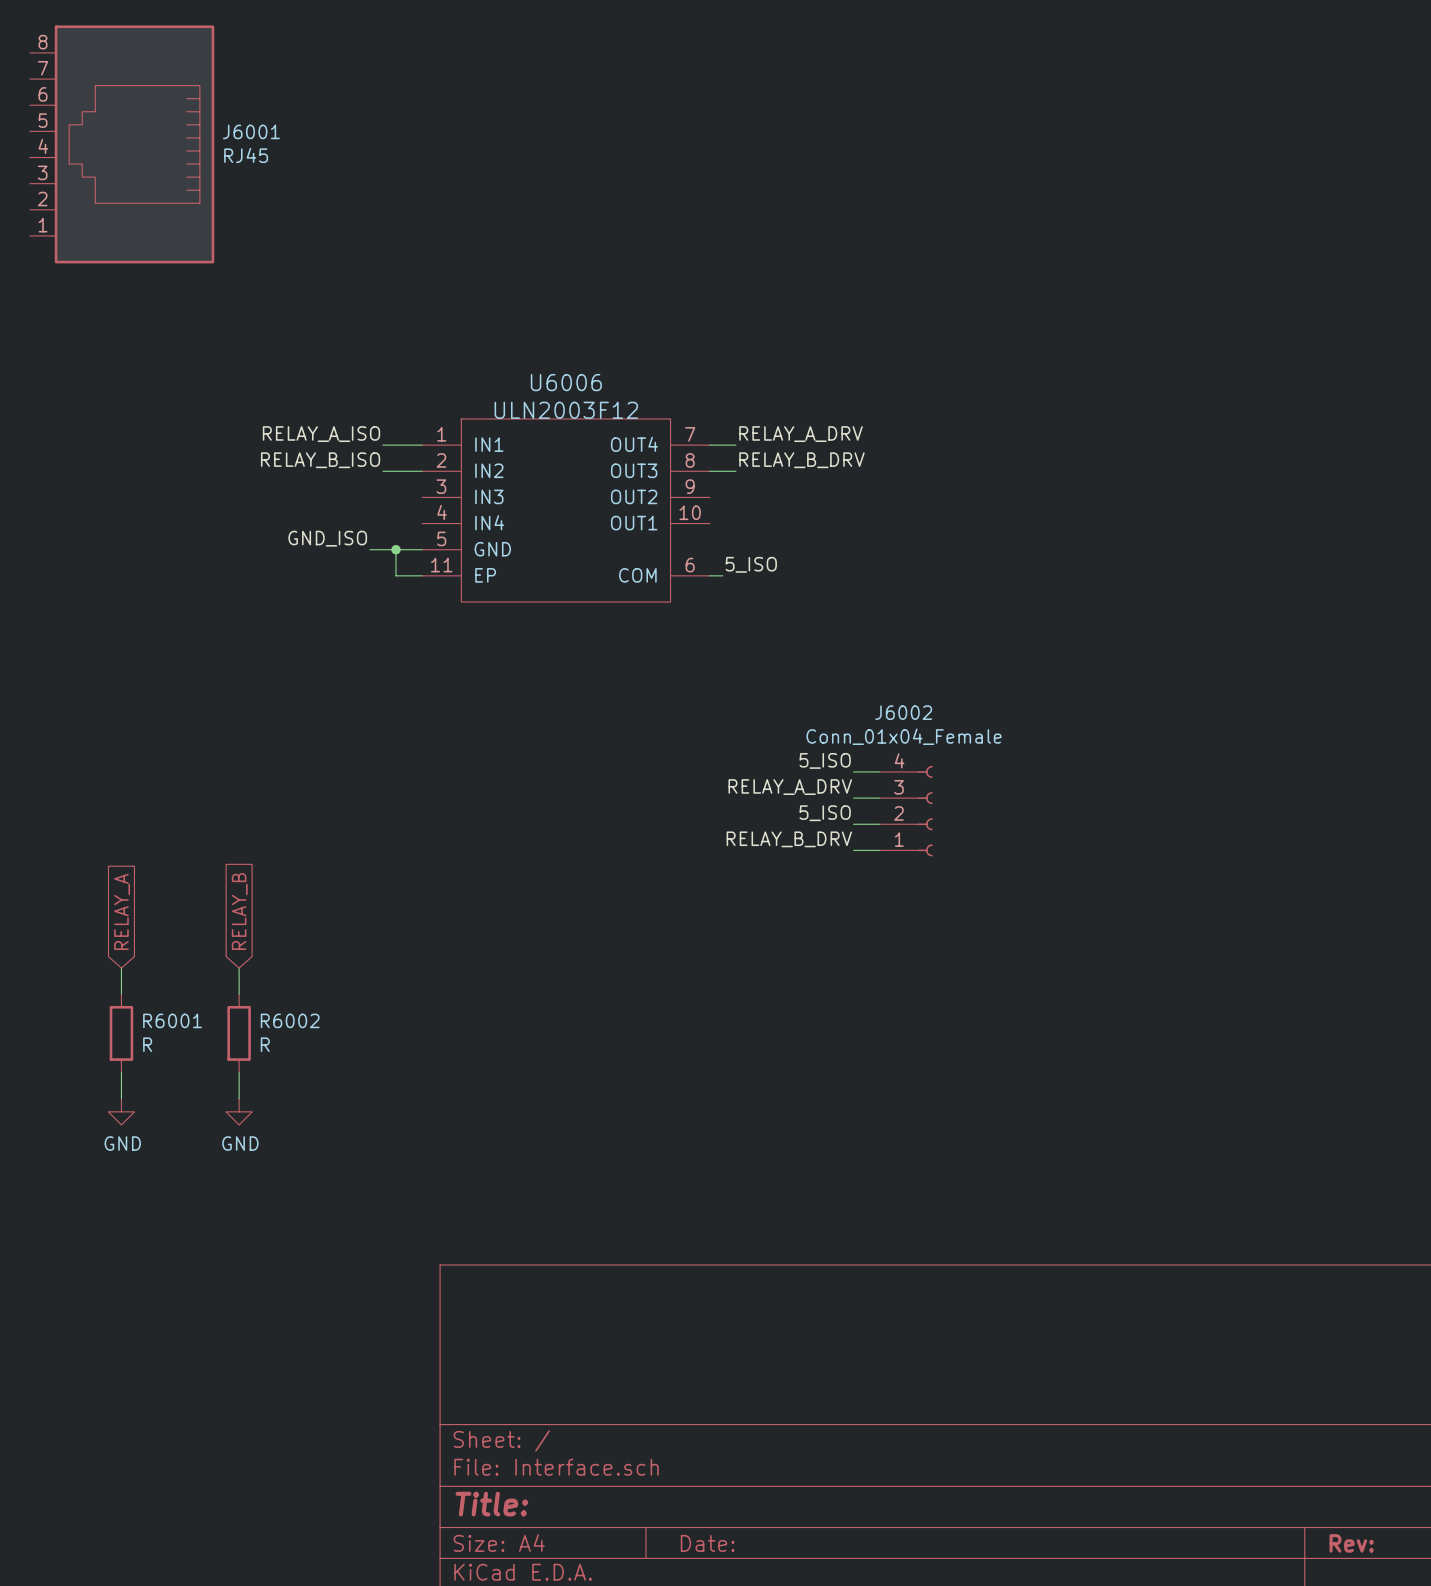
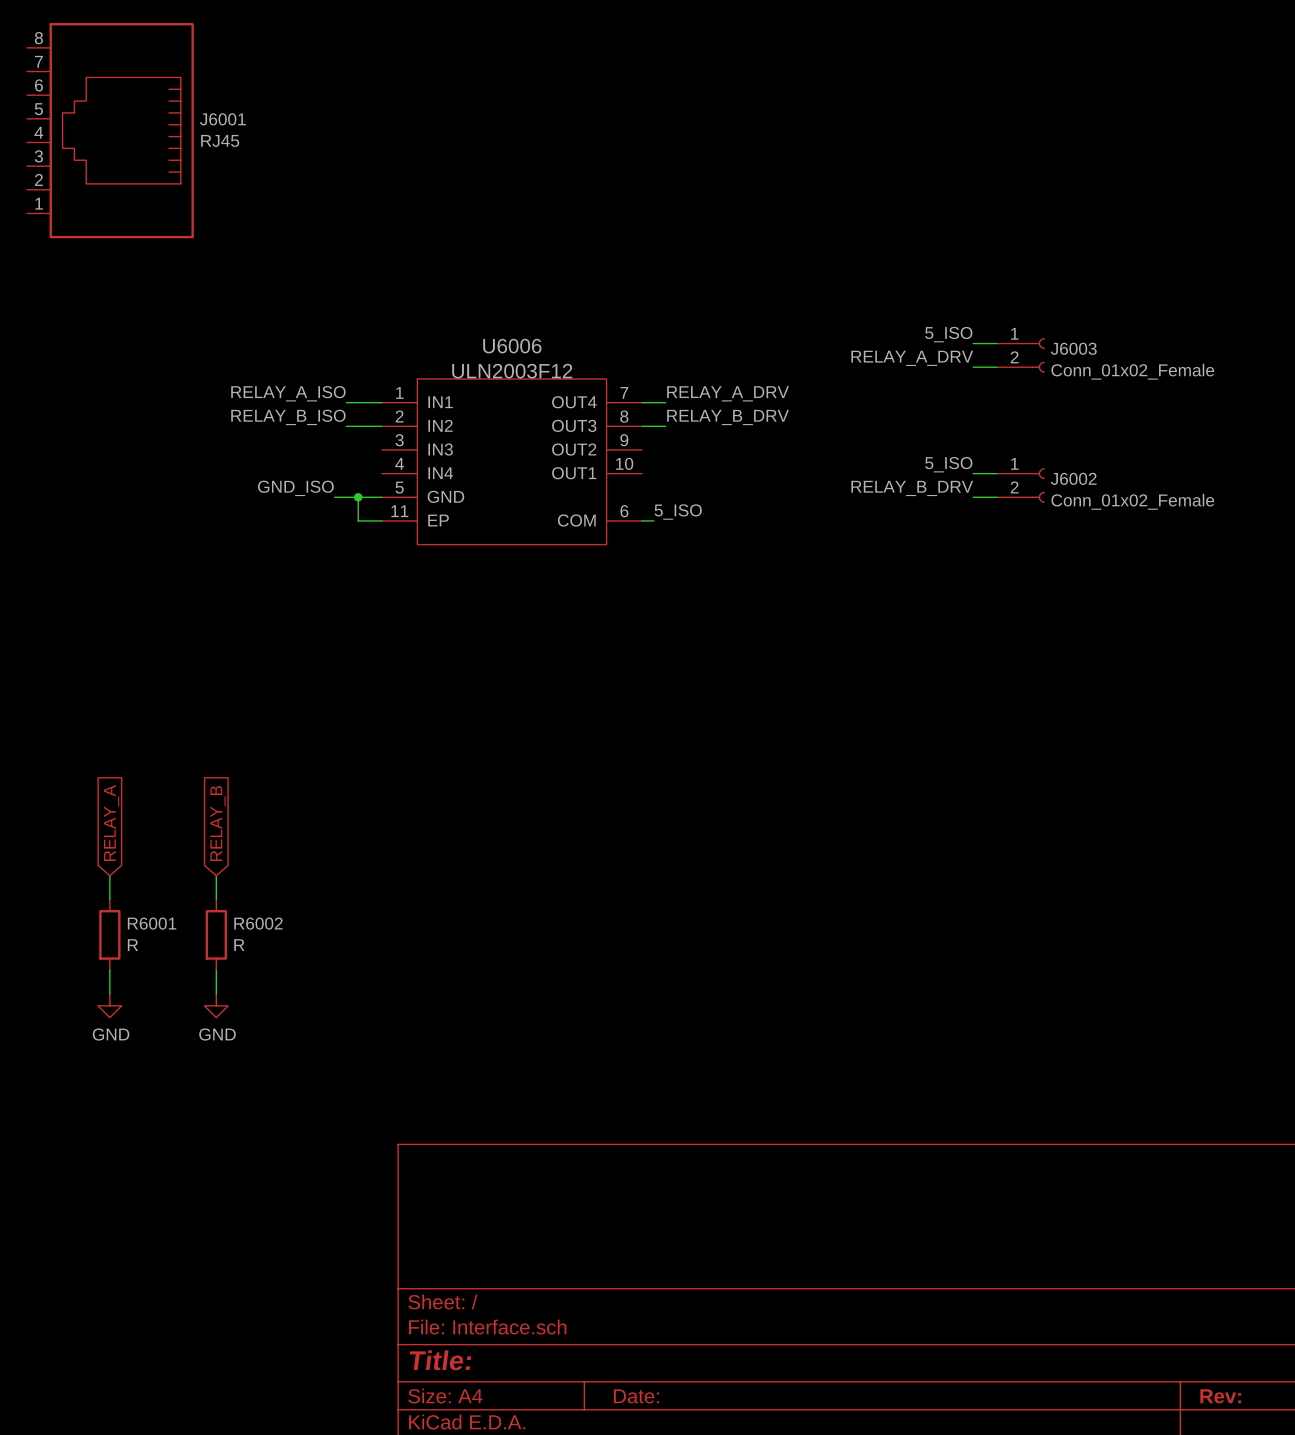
label: none -> 5_ISO (948, 334)
wire: none -> (973, 343) (996, 343)
J6003: none -> Conn_01x02_Female (1020, 355)
label: none -> RELAY_A_DRV (912, 358)
wire: none -> (973, 367) (996, 367)
label: none -> 5_ISO (948, 464)
wire: none -> (973, 473) (996, 473)
label: none -> RELAY_B_DRV (912, 488)
wire: none -> (973, 497) (996, 497)
J6002 name position: J6002 (903, 712) -> J6002 (1073, 478)
J6002 value: Conn_01x04_Female (904, 736) -> Conn_01x02_Female (1132, 501)
label: 5_ISO (825, 760) -> none
J6002 symbol: [879, 765, 933, 857] -> [996, 468, 1045, 503]
wire: (853, 771) (879, 771) -> none
label: RELAY_A_DRV (790, 787) -> none
wire: (853, 798) (879, 798) -> none
label: 5_ISO (825, 813) -> none
wire: (853, 824) (879, 824) -> none
label: RELAY_B_DRV (789, 839) -> none
wire: (853, 850) (879, 850) -> none

